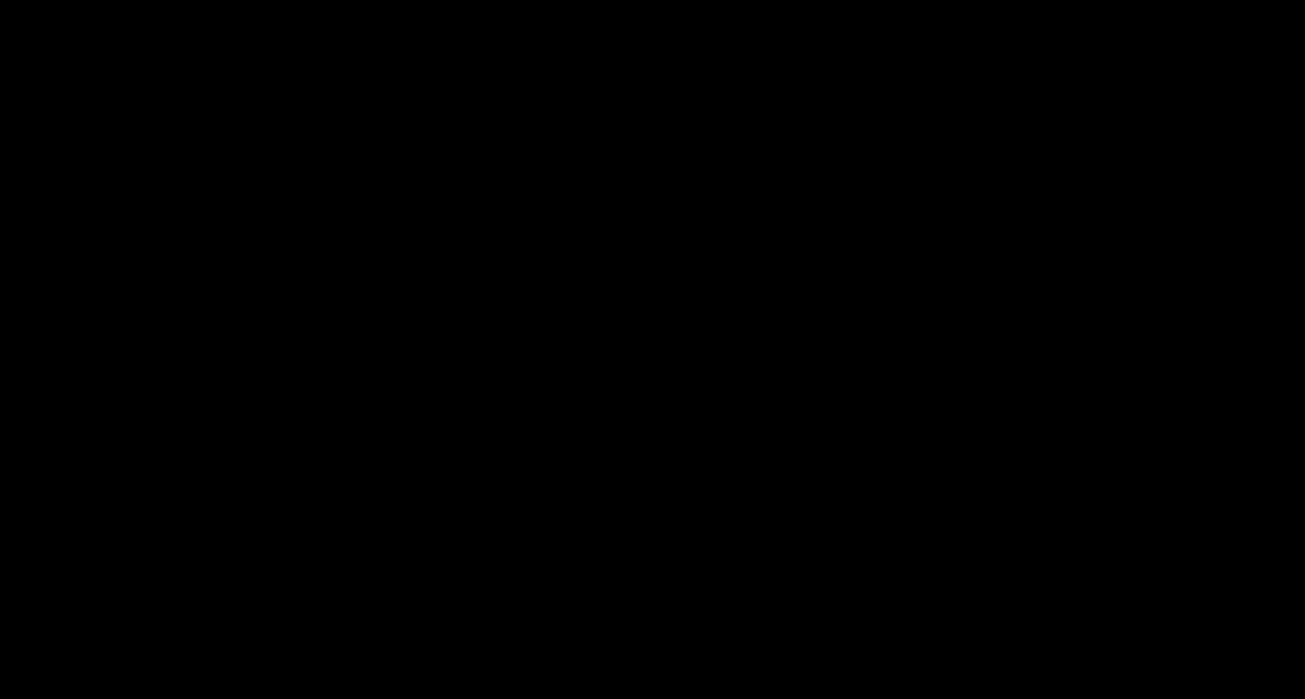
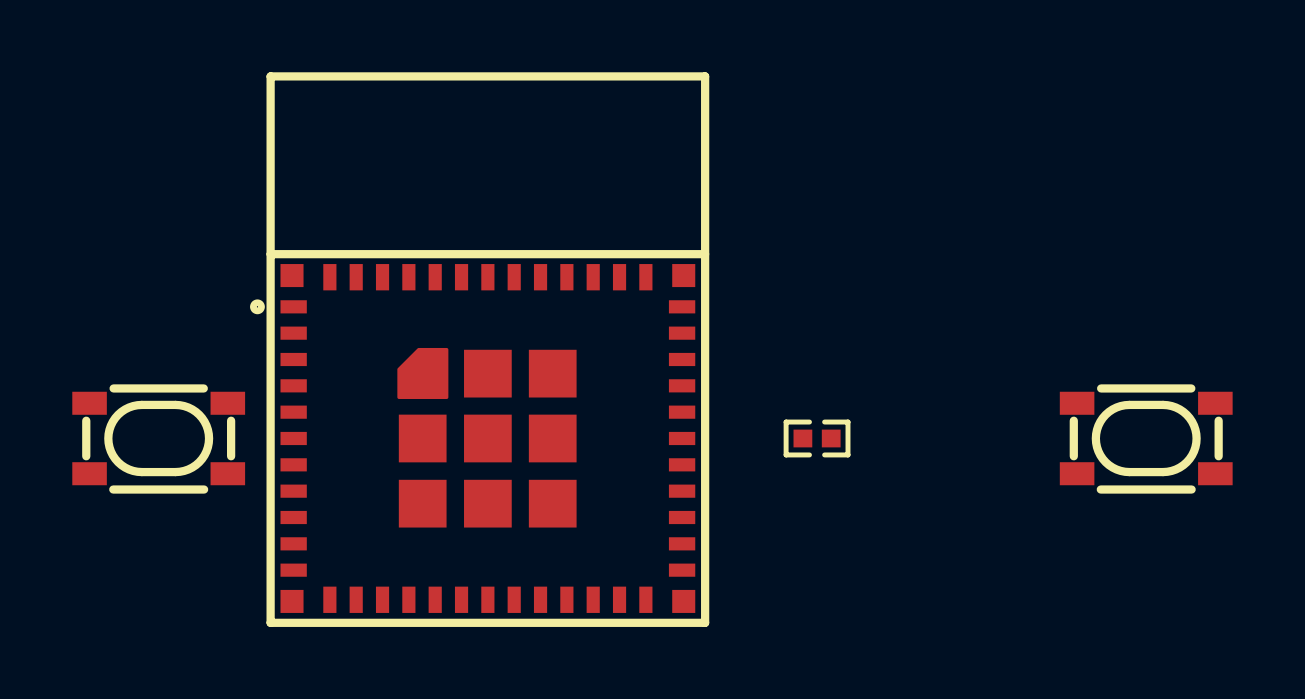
part: none -> (479, 349)
part: none -> (158, 438)
part: none -> (817, 438)
part: none -> (1146, 438)

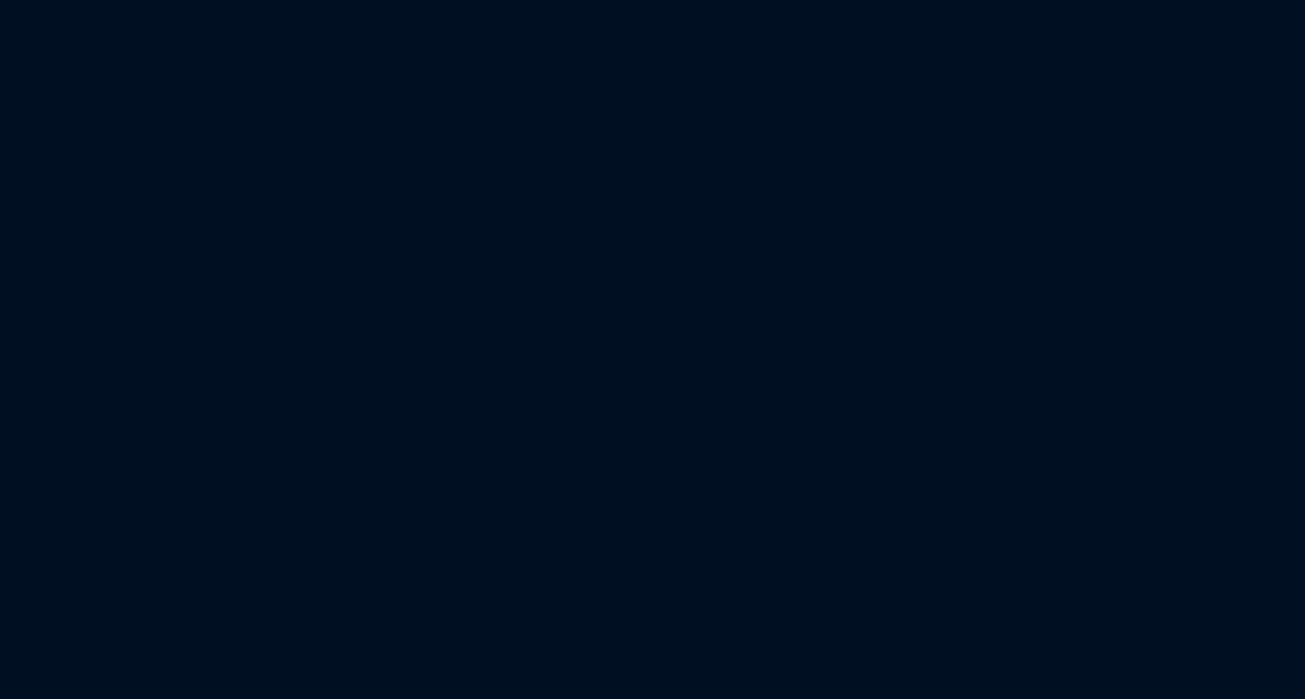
part: (479, 349) -> none
part: (158, 438) -> none
part: (817, 438) -> none
part: (1146, 438) -> none

